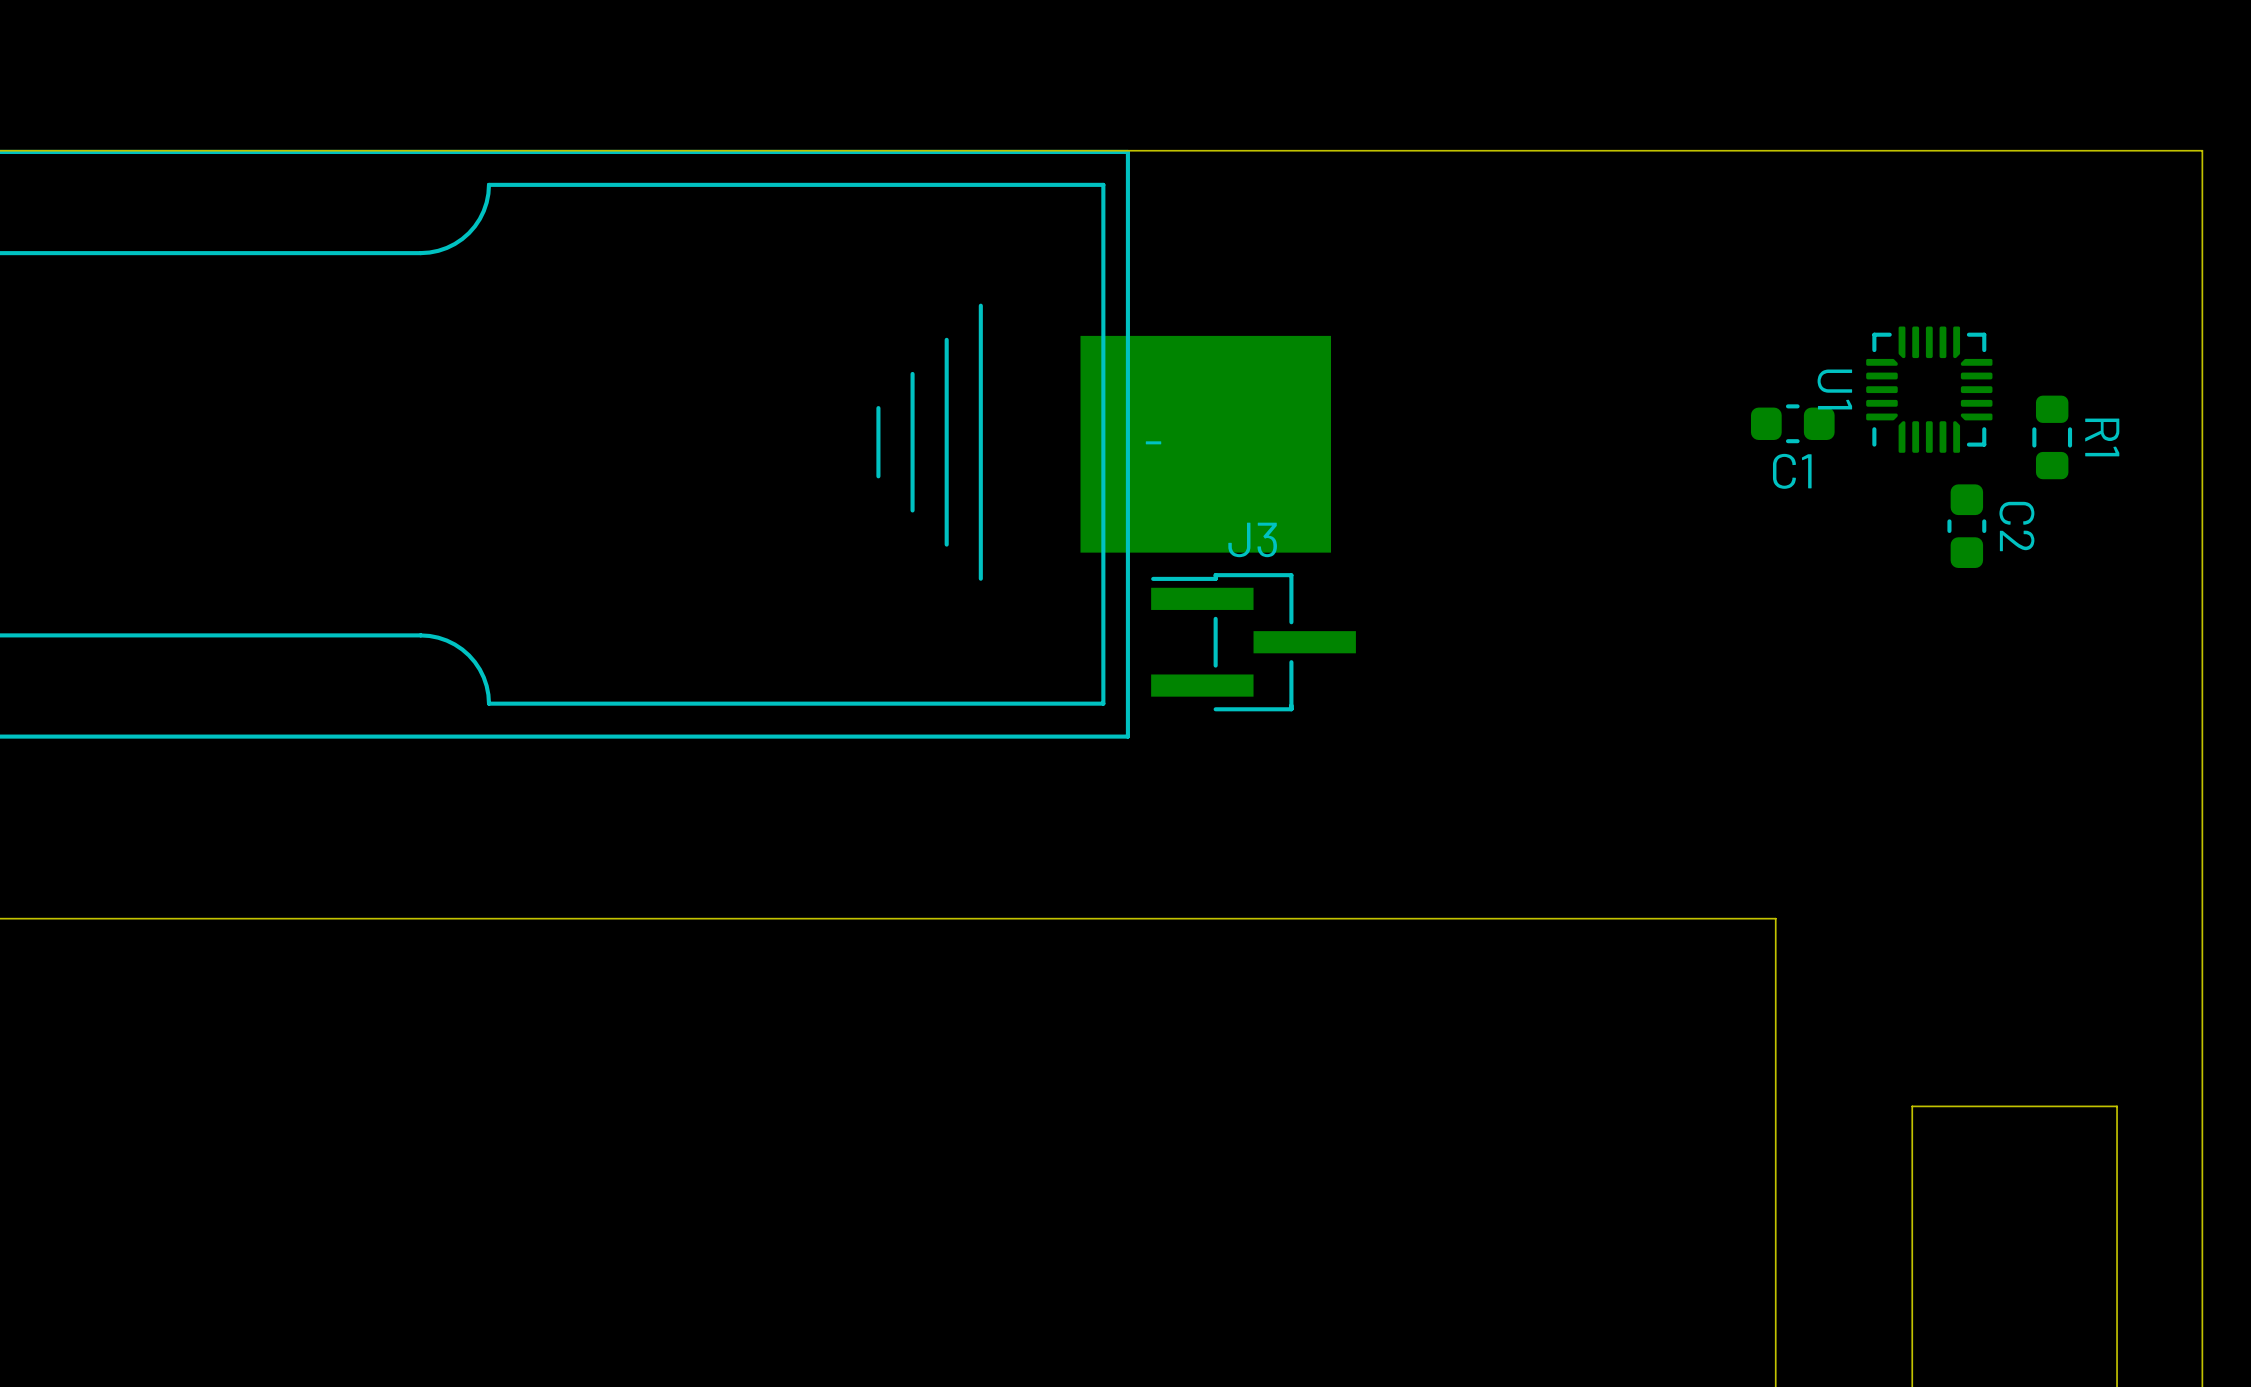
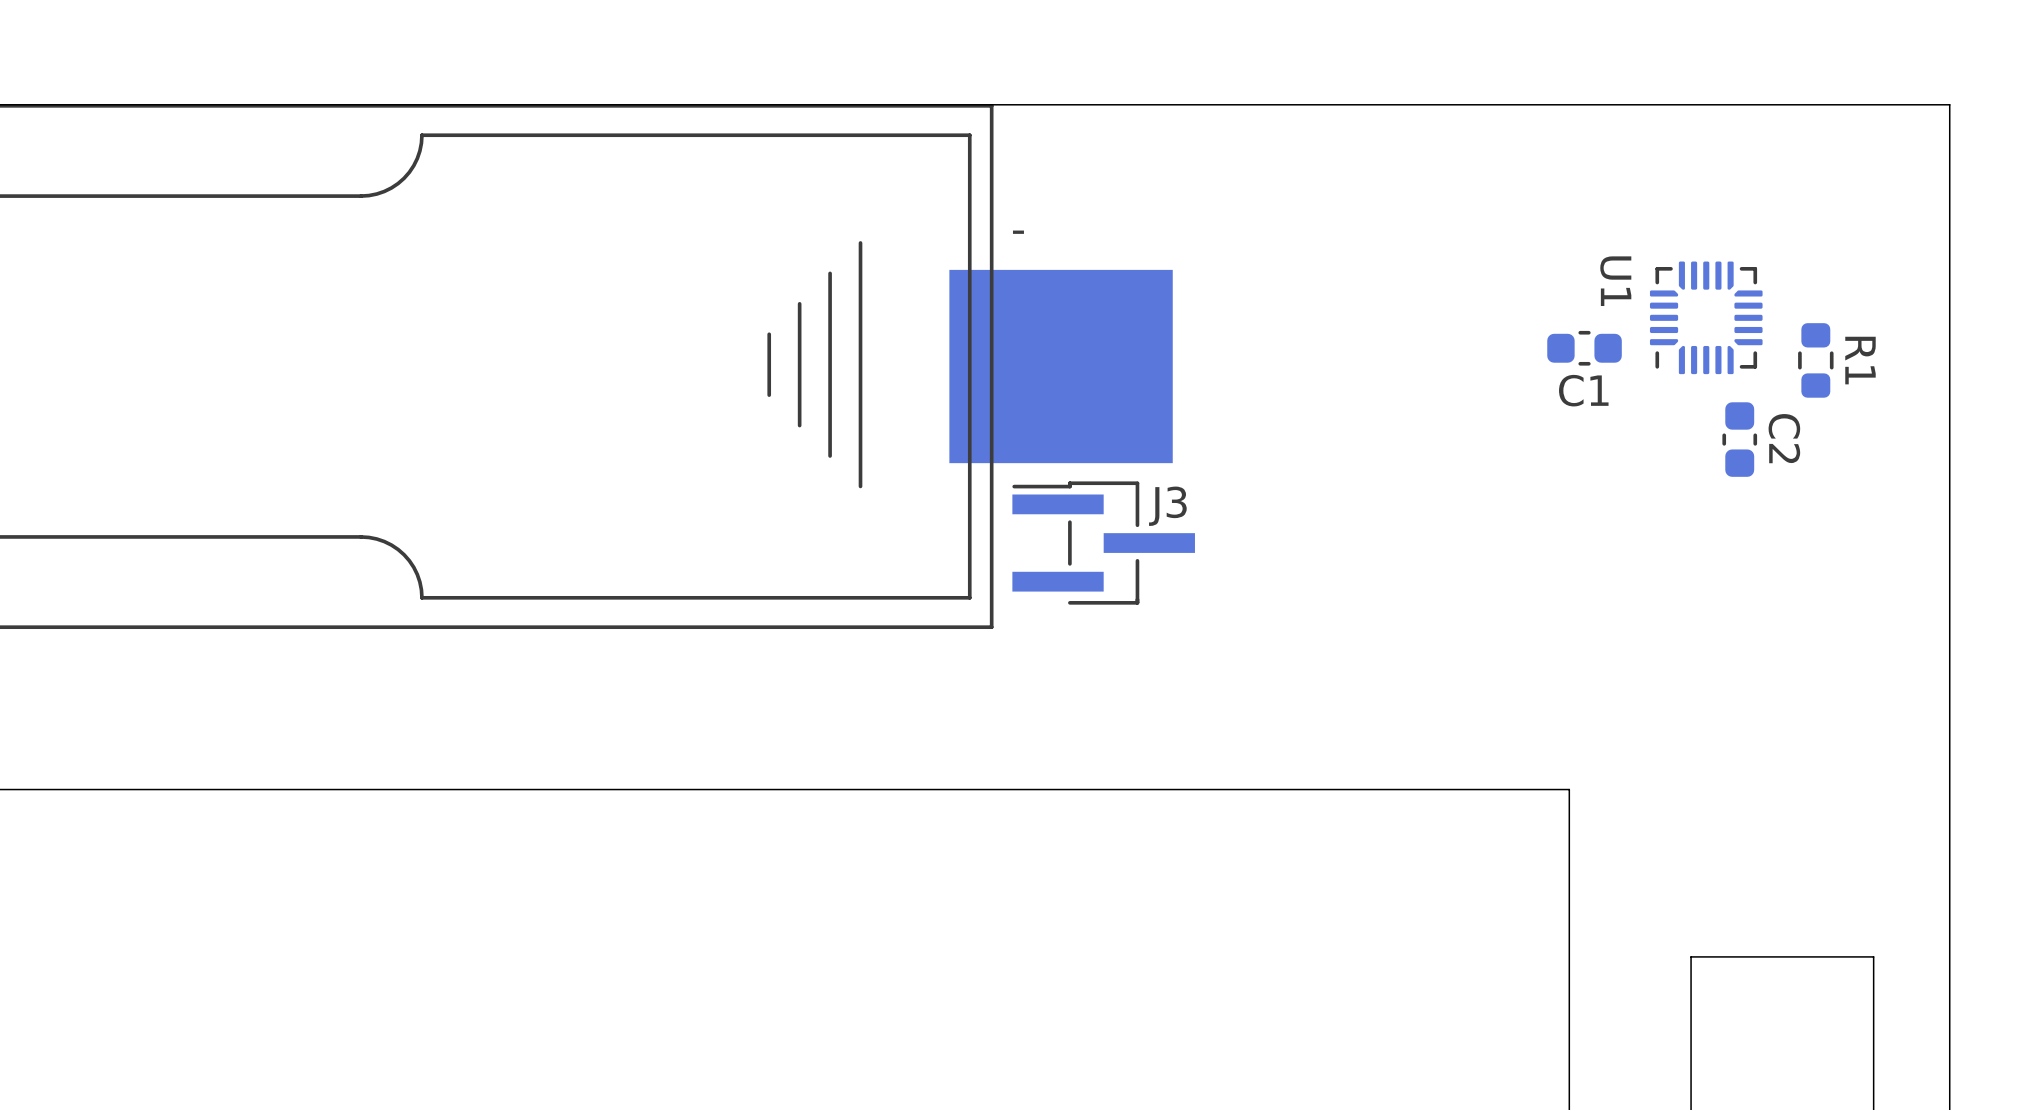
U1 name position: U1 (1834, 389) -> U1 (1615, 281)
part text position: - (1153, 442) -> - (1018, 232)
J3 name position: J3 (1252, 539) -> J3 (1167, 506)

